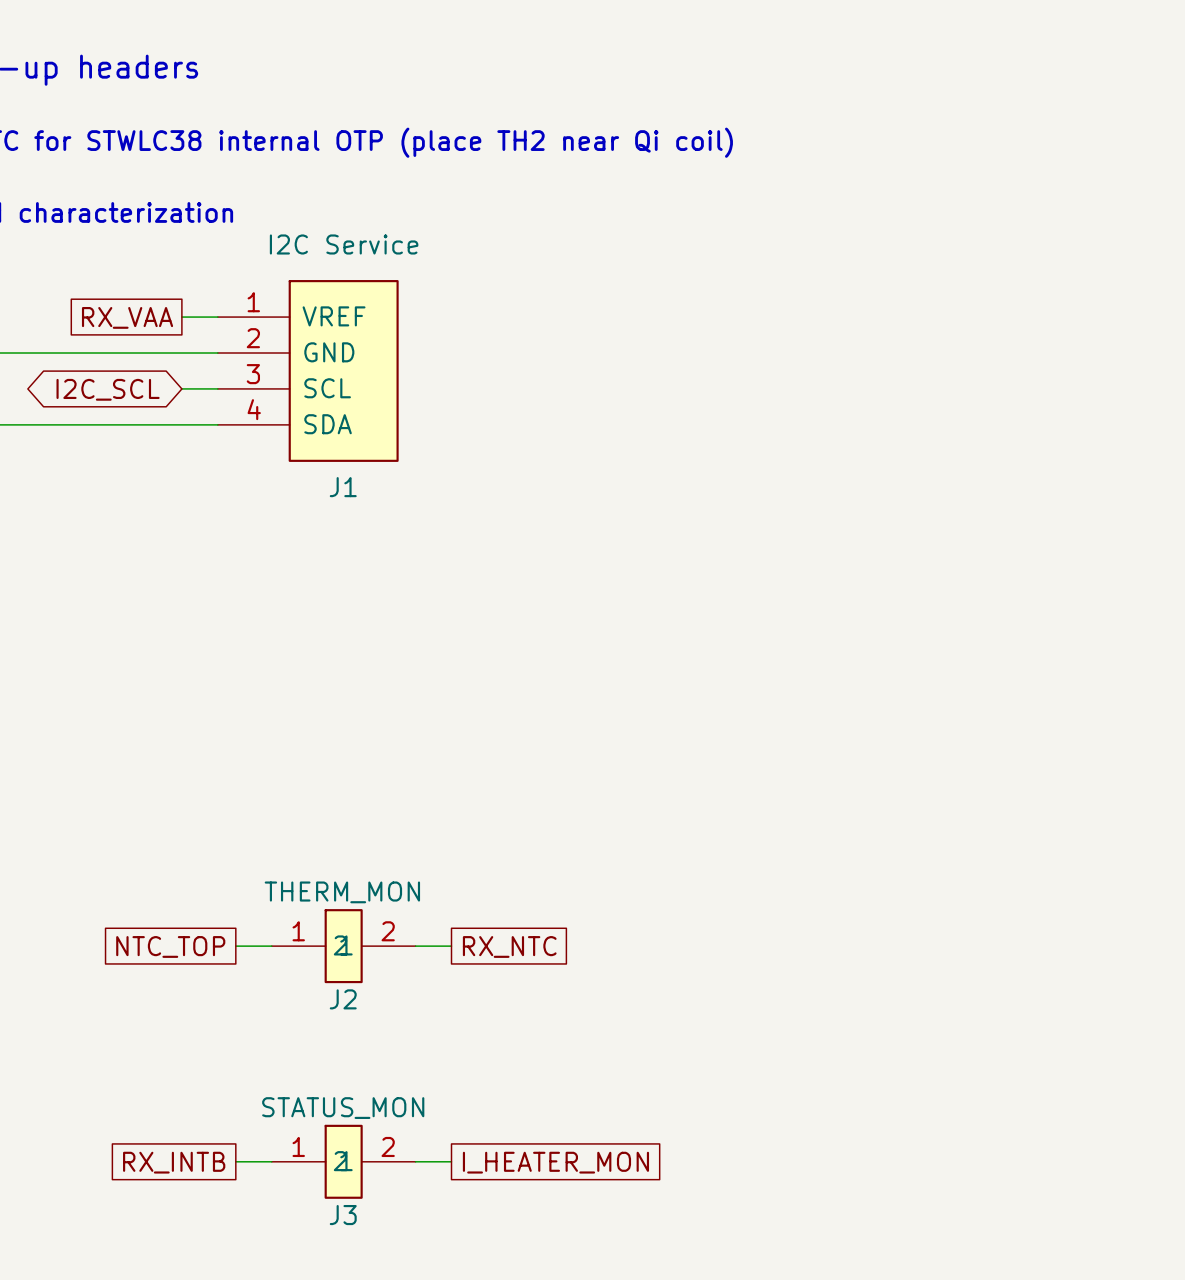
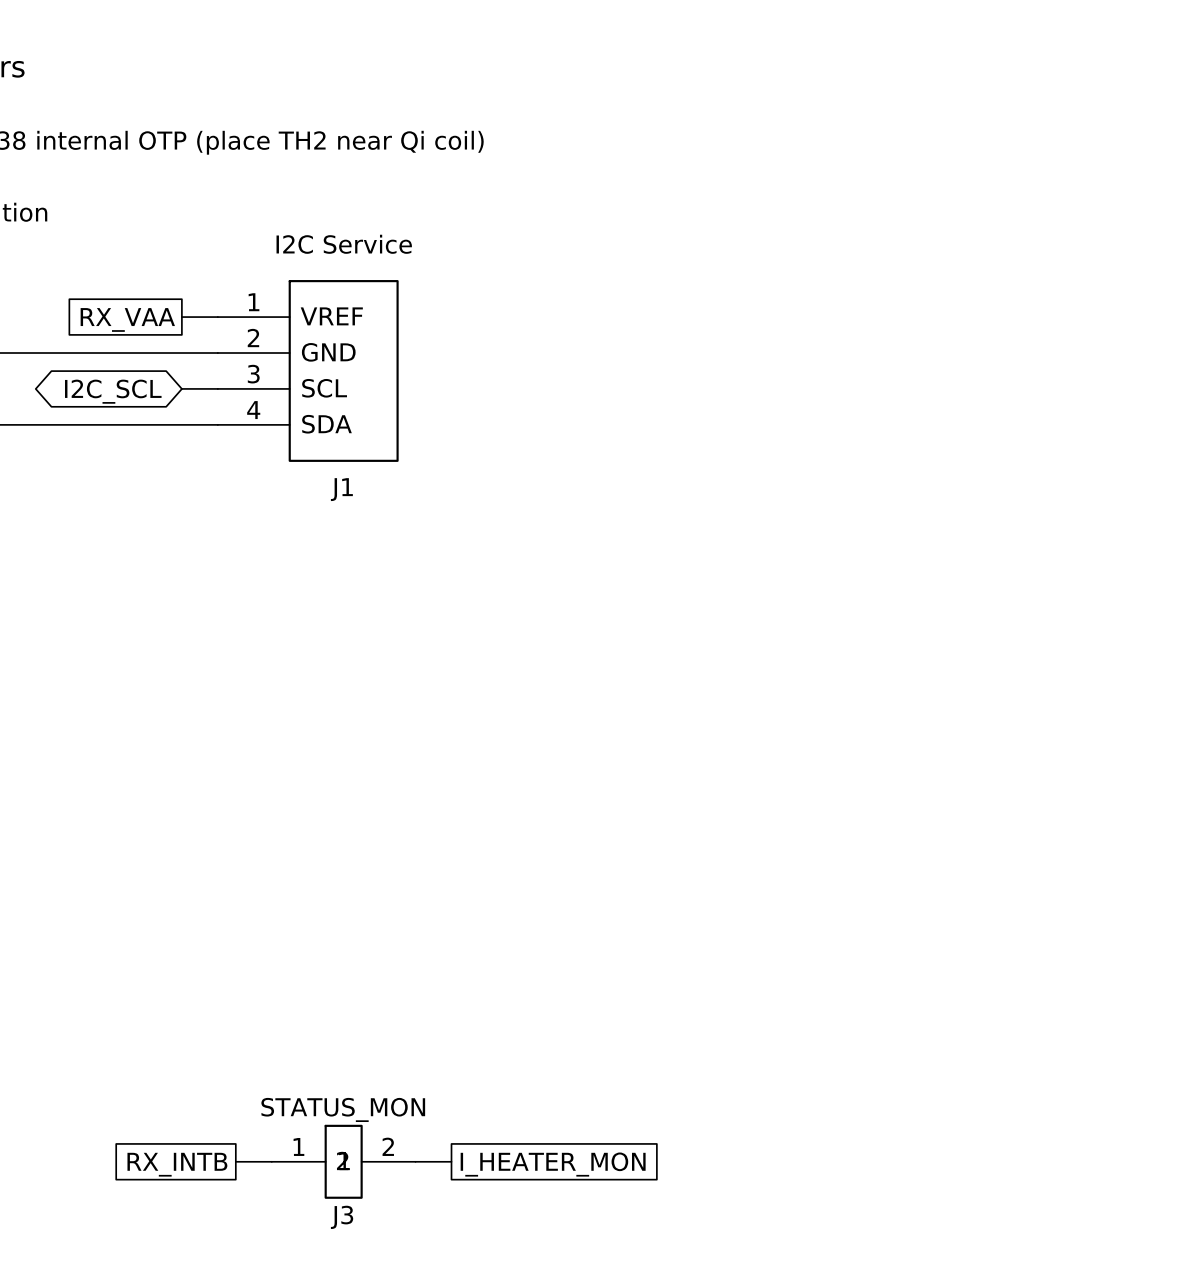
global label: NTC_TOP (170, 946) -> none
wire: (235, 946) (271, 946) -> none
J2: THERM_MON (343, 946) -> none
wire: (415, 946) (451, 946) -> none
global label: RX_NTC (509, 946) -> none

